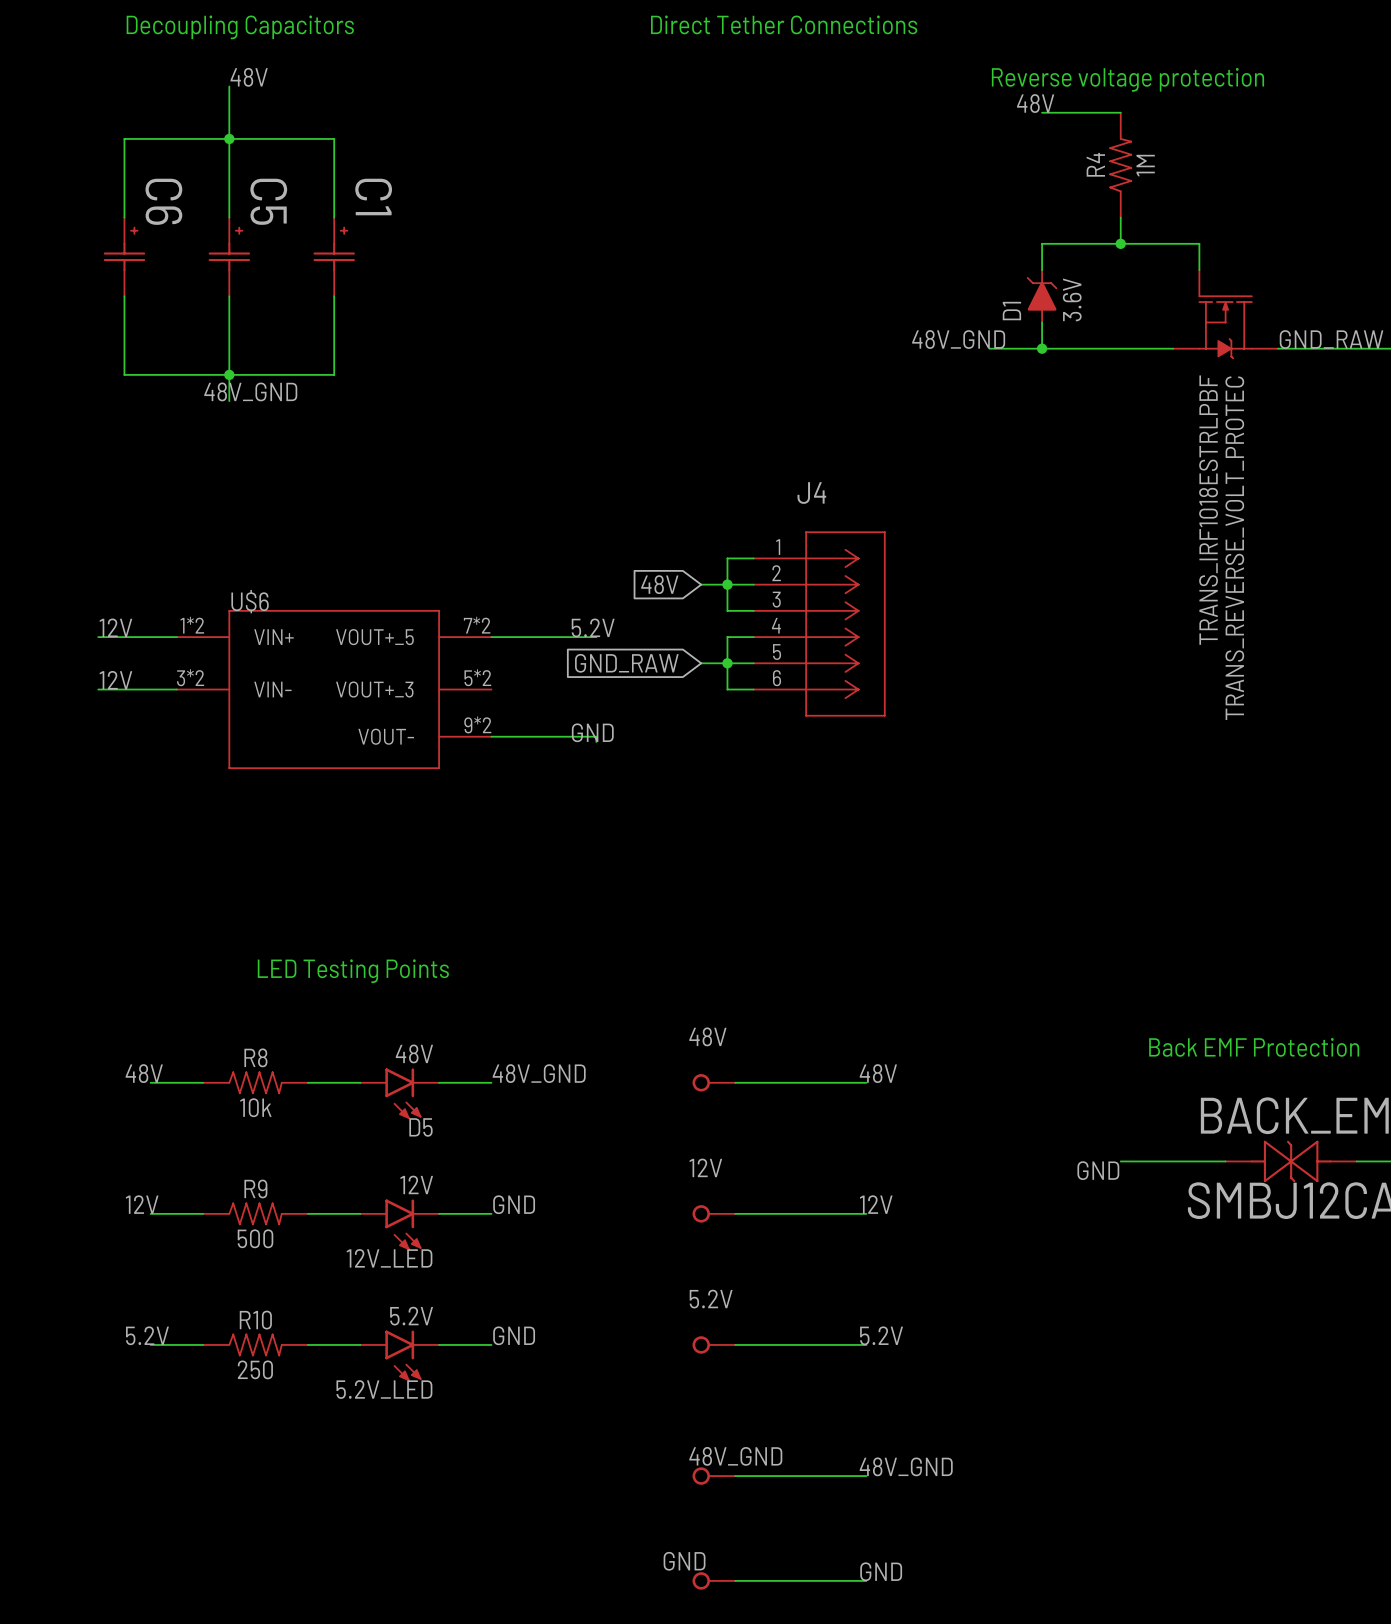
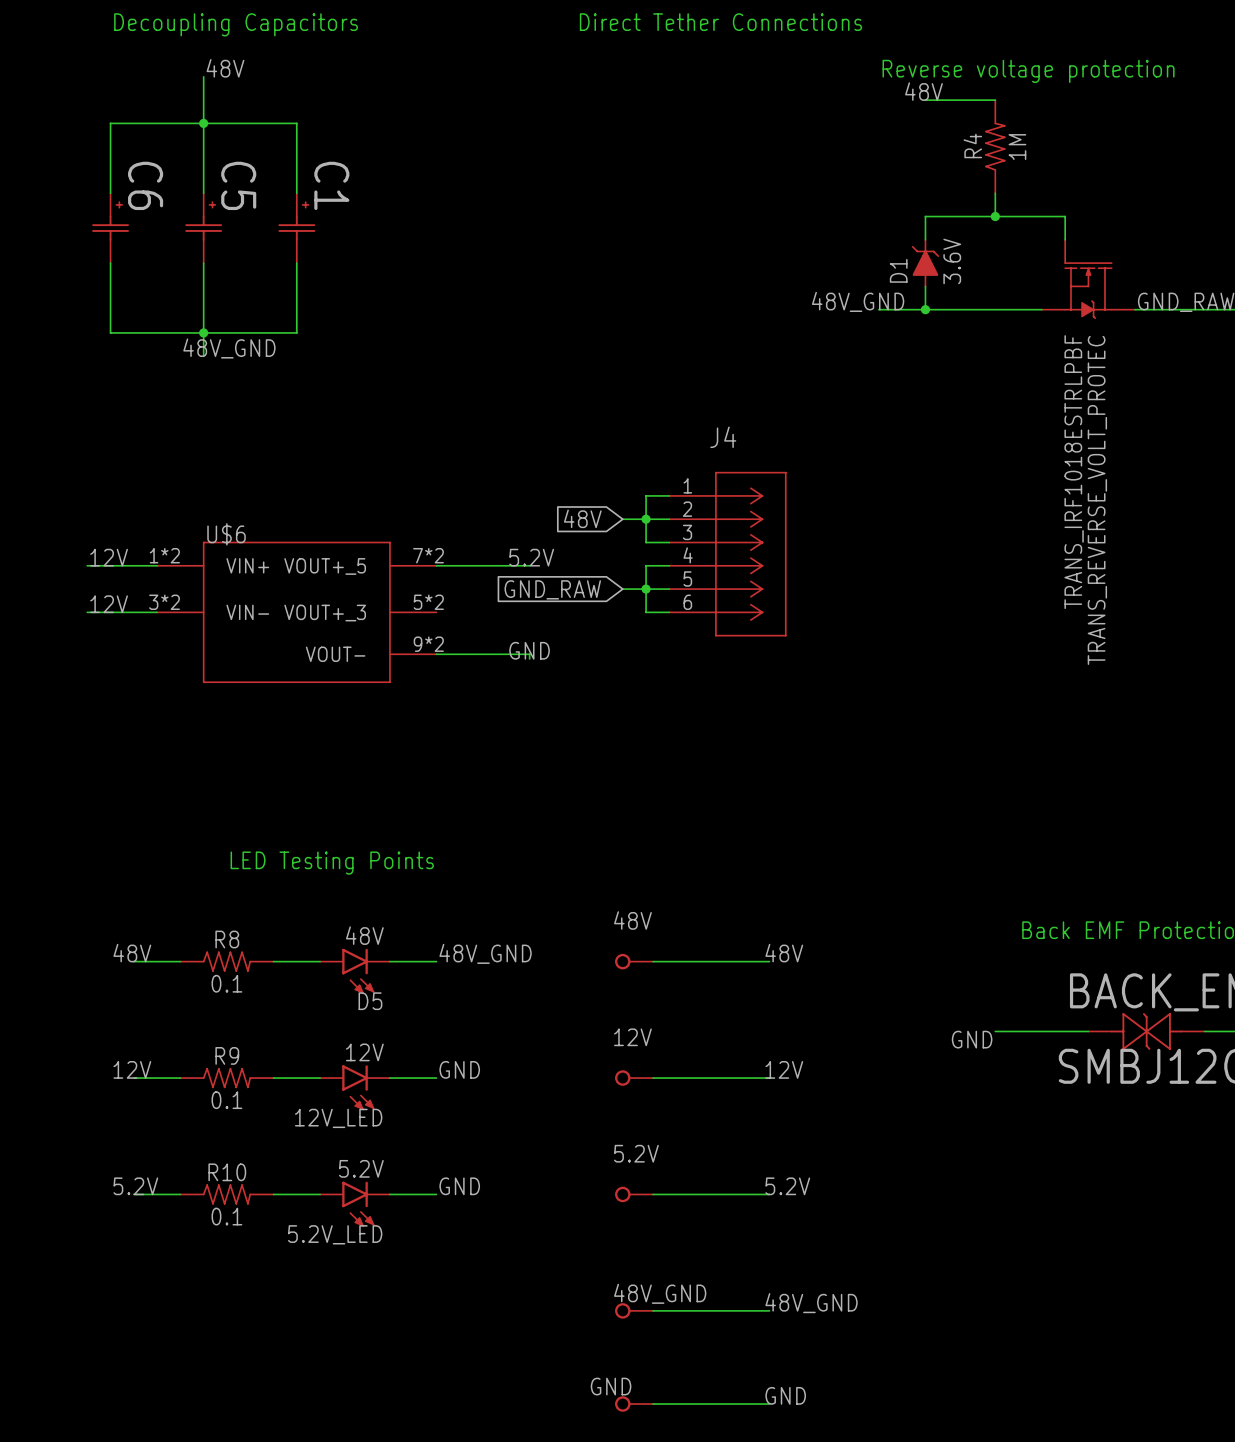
R8 value: 10k (255, 1107) -> 0.1 (226, 983)
R9 value: 500 (255, 1238) -> 0.1 (226, 1100)
R10 value: 250 (255, 1369) -> 0.1 (226, 1216)

